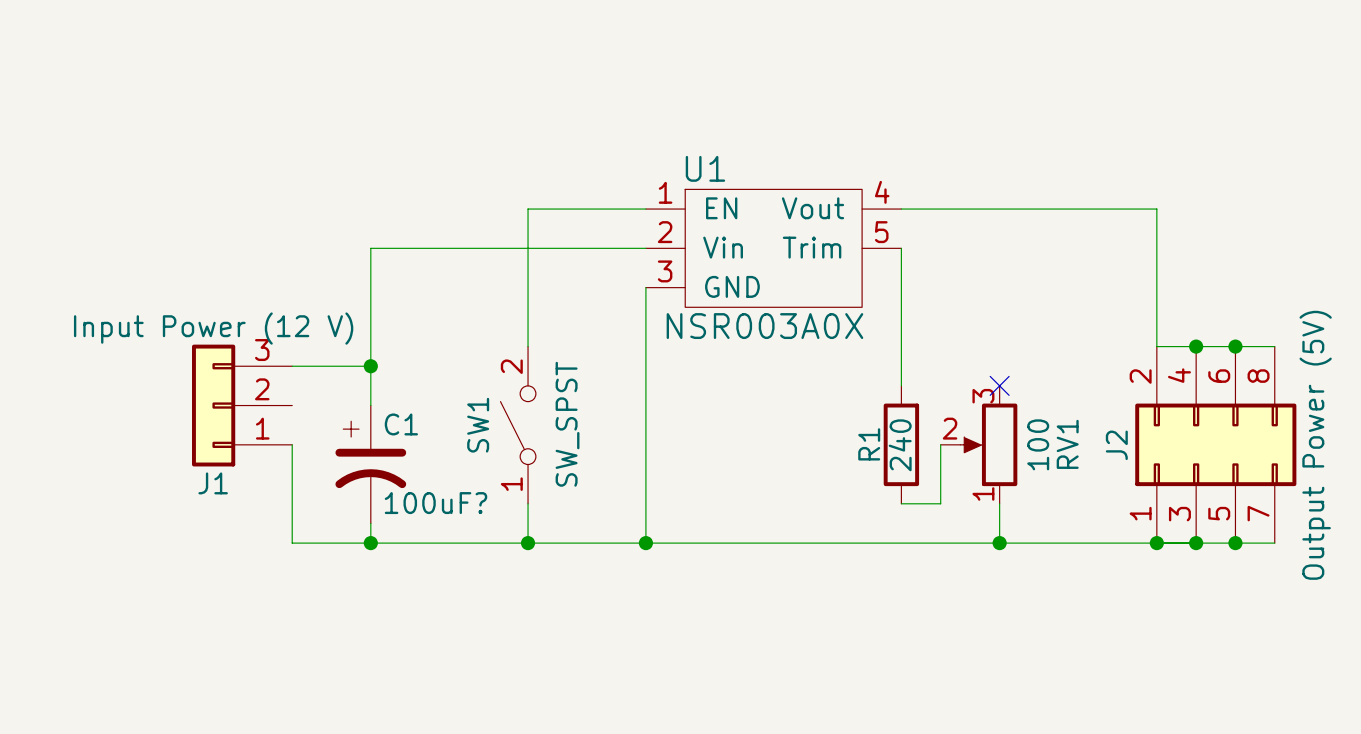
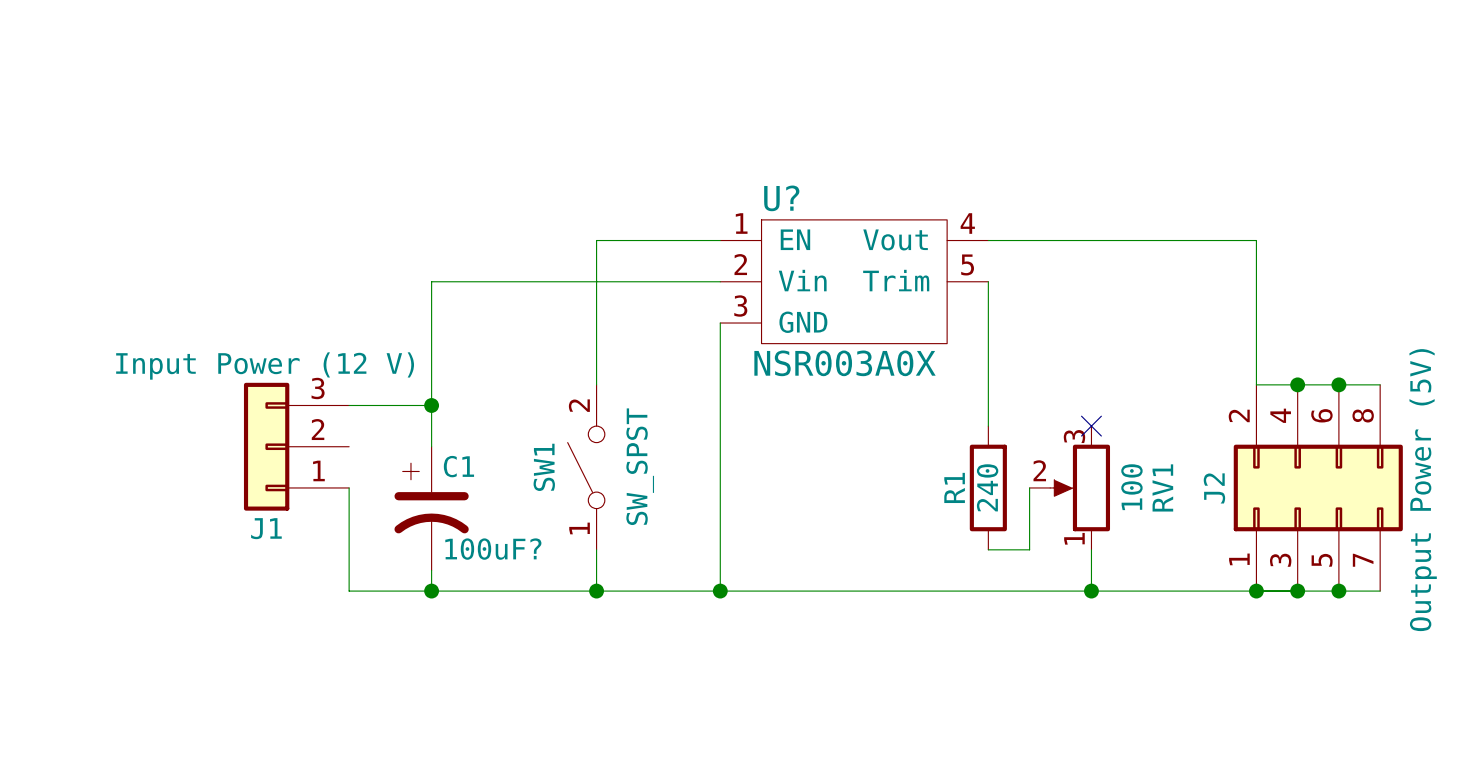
U1 name: U1 (705, 168) -> U? (781, 198)

